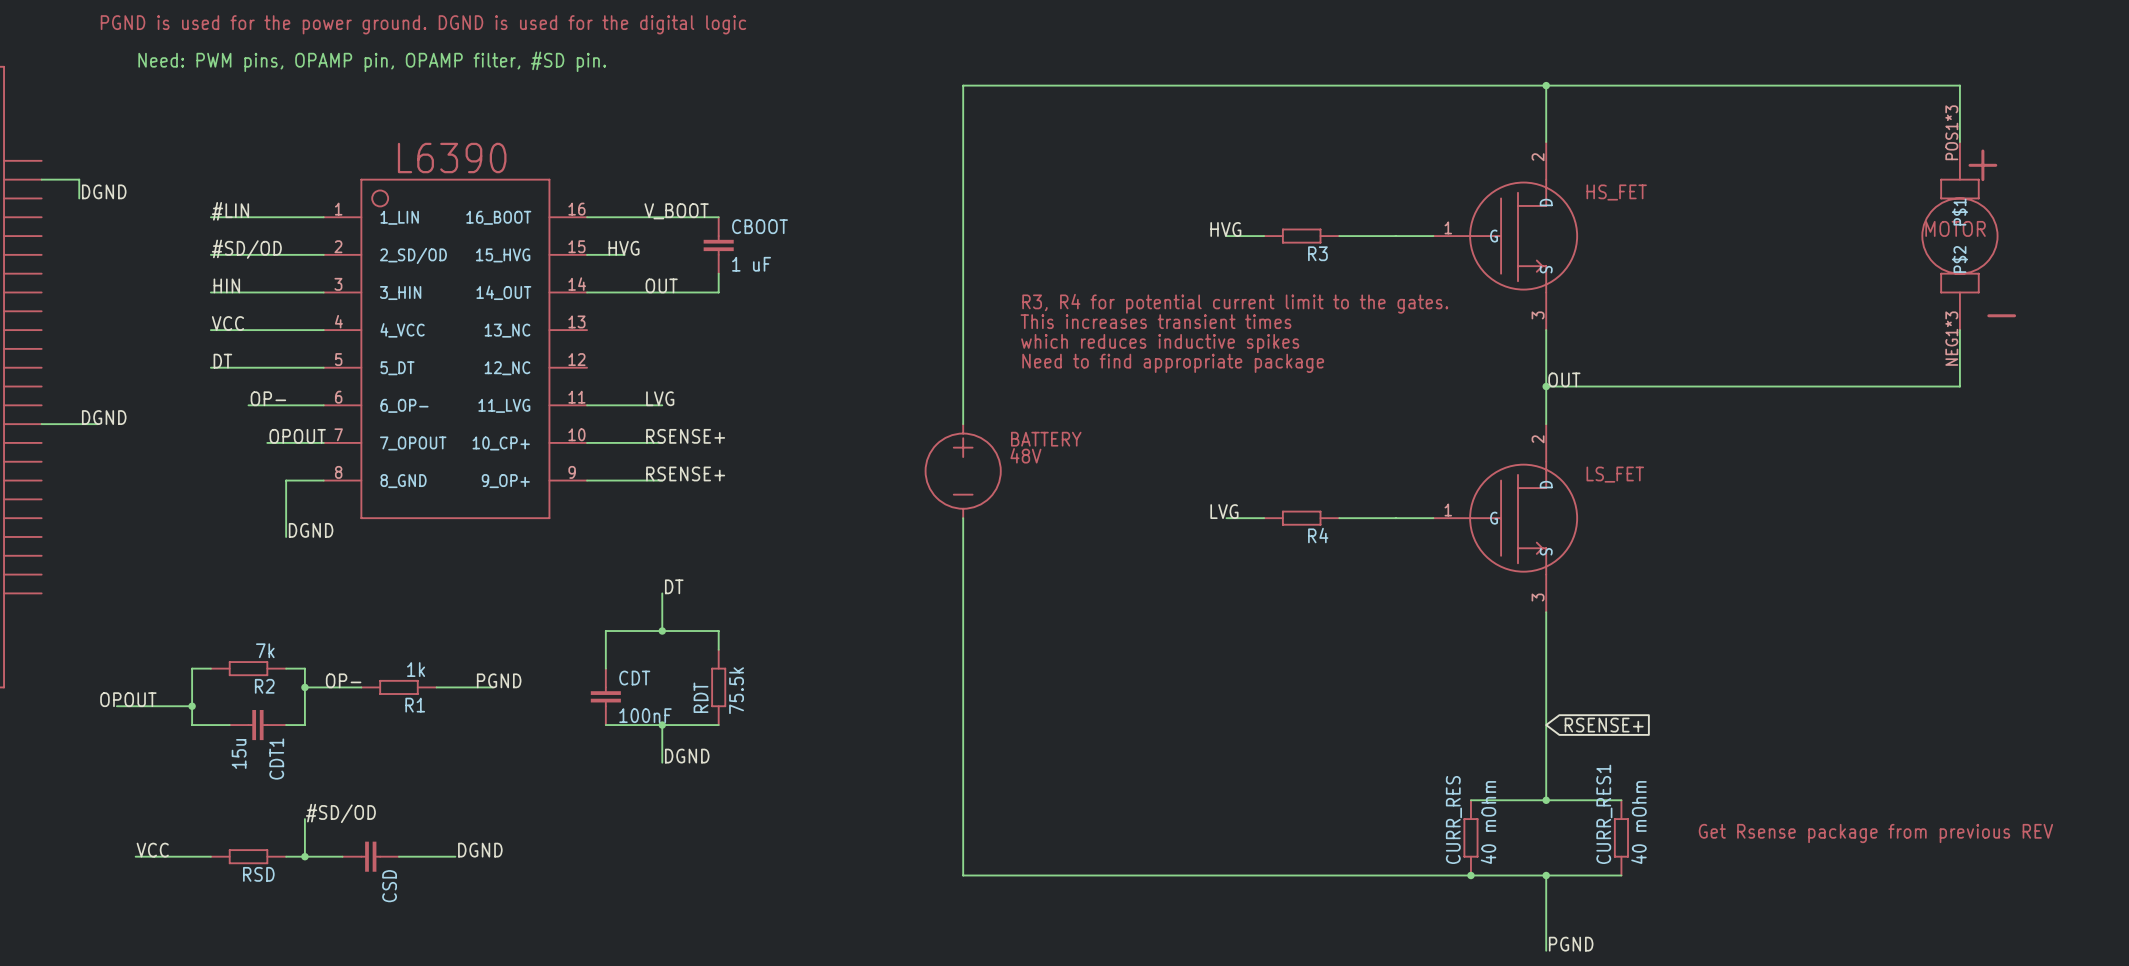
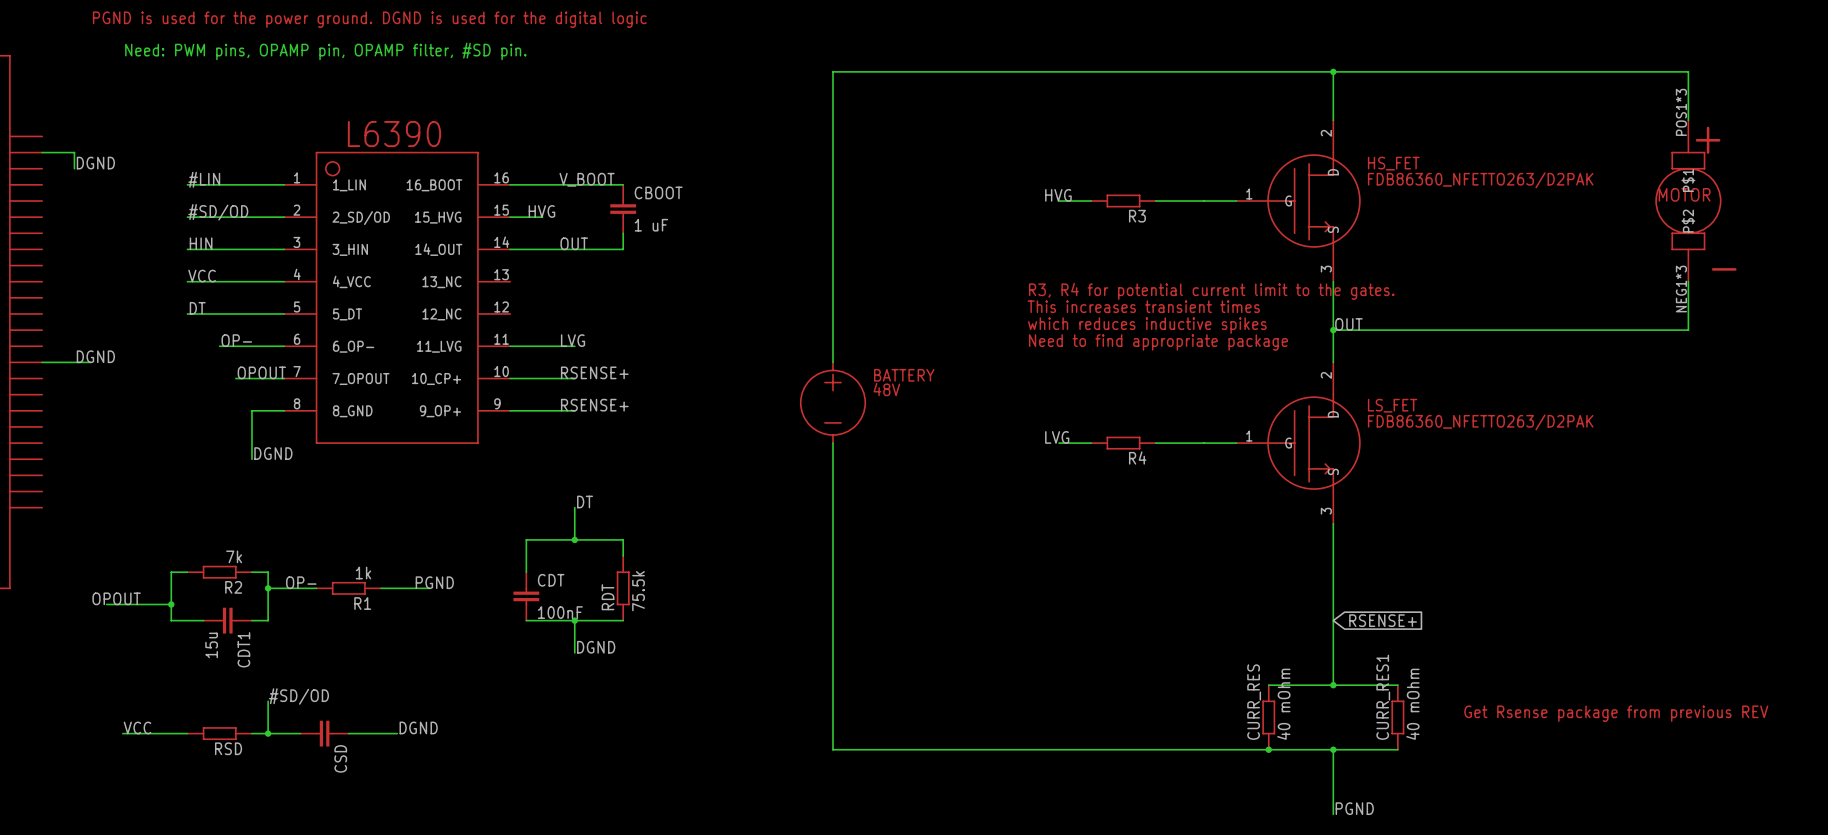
HS_FET value: none -> FDB86360_NFETTO263/D2PAK (1480, 180)
text position: R3, R4 for potential current limit to the gates. (1235, 303) -> R3, R4 for potential current limit to the gates. (1211, 291)
text position: This increases transient times (1155, 321) -> This increases transient times (1143, 306)
text position: which reduces inductive spikes (1160, 343) -> which reduces inductive spikes (1147, 325)
text position: Need to find appropriate package (1173, 363) -> Need to find appropriate package (1158, 342)
LS_FET value: none -> FDB86360_NFETTO263/D2PAK (1480, 422)

